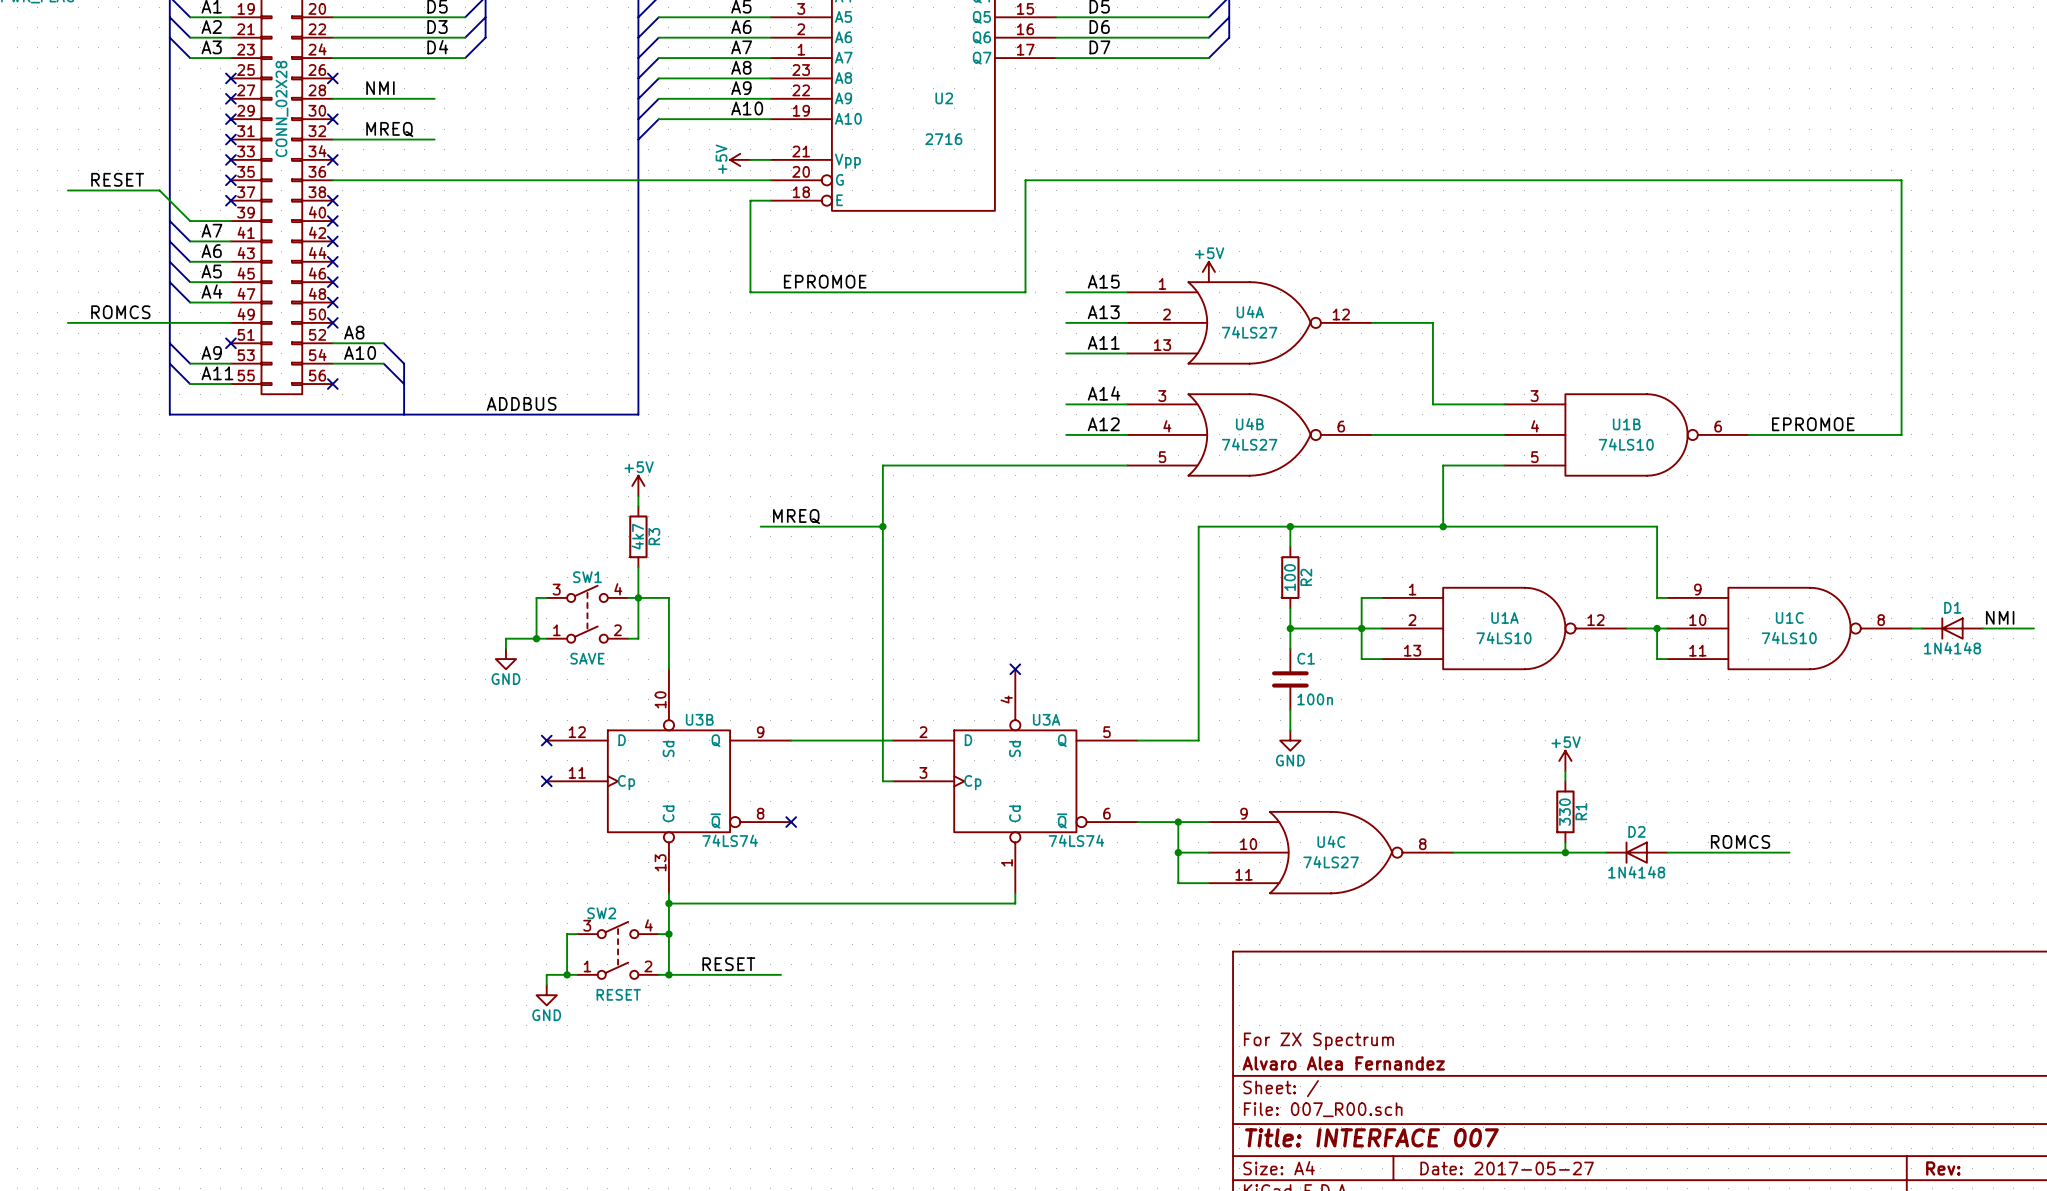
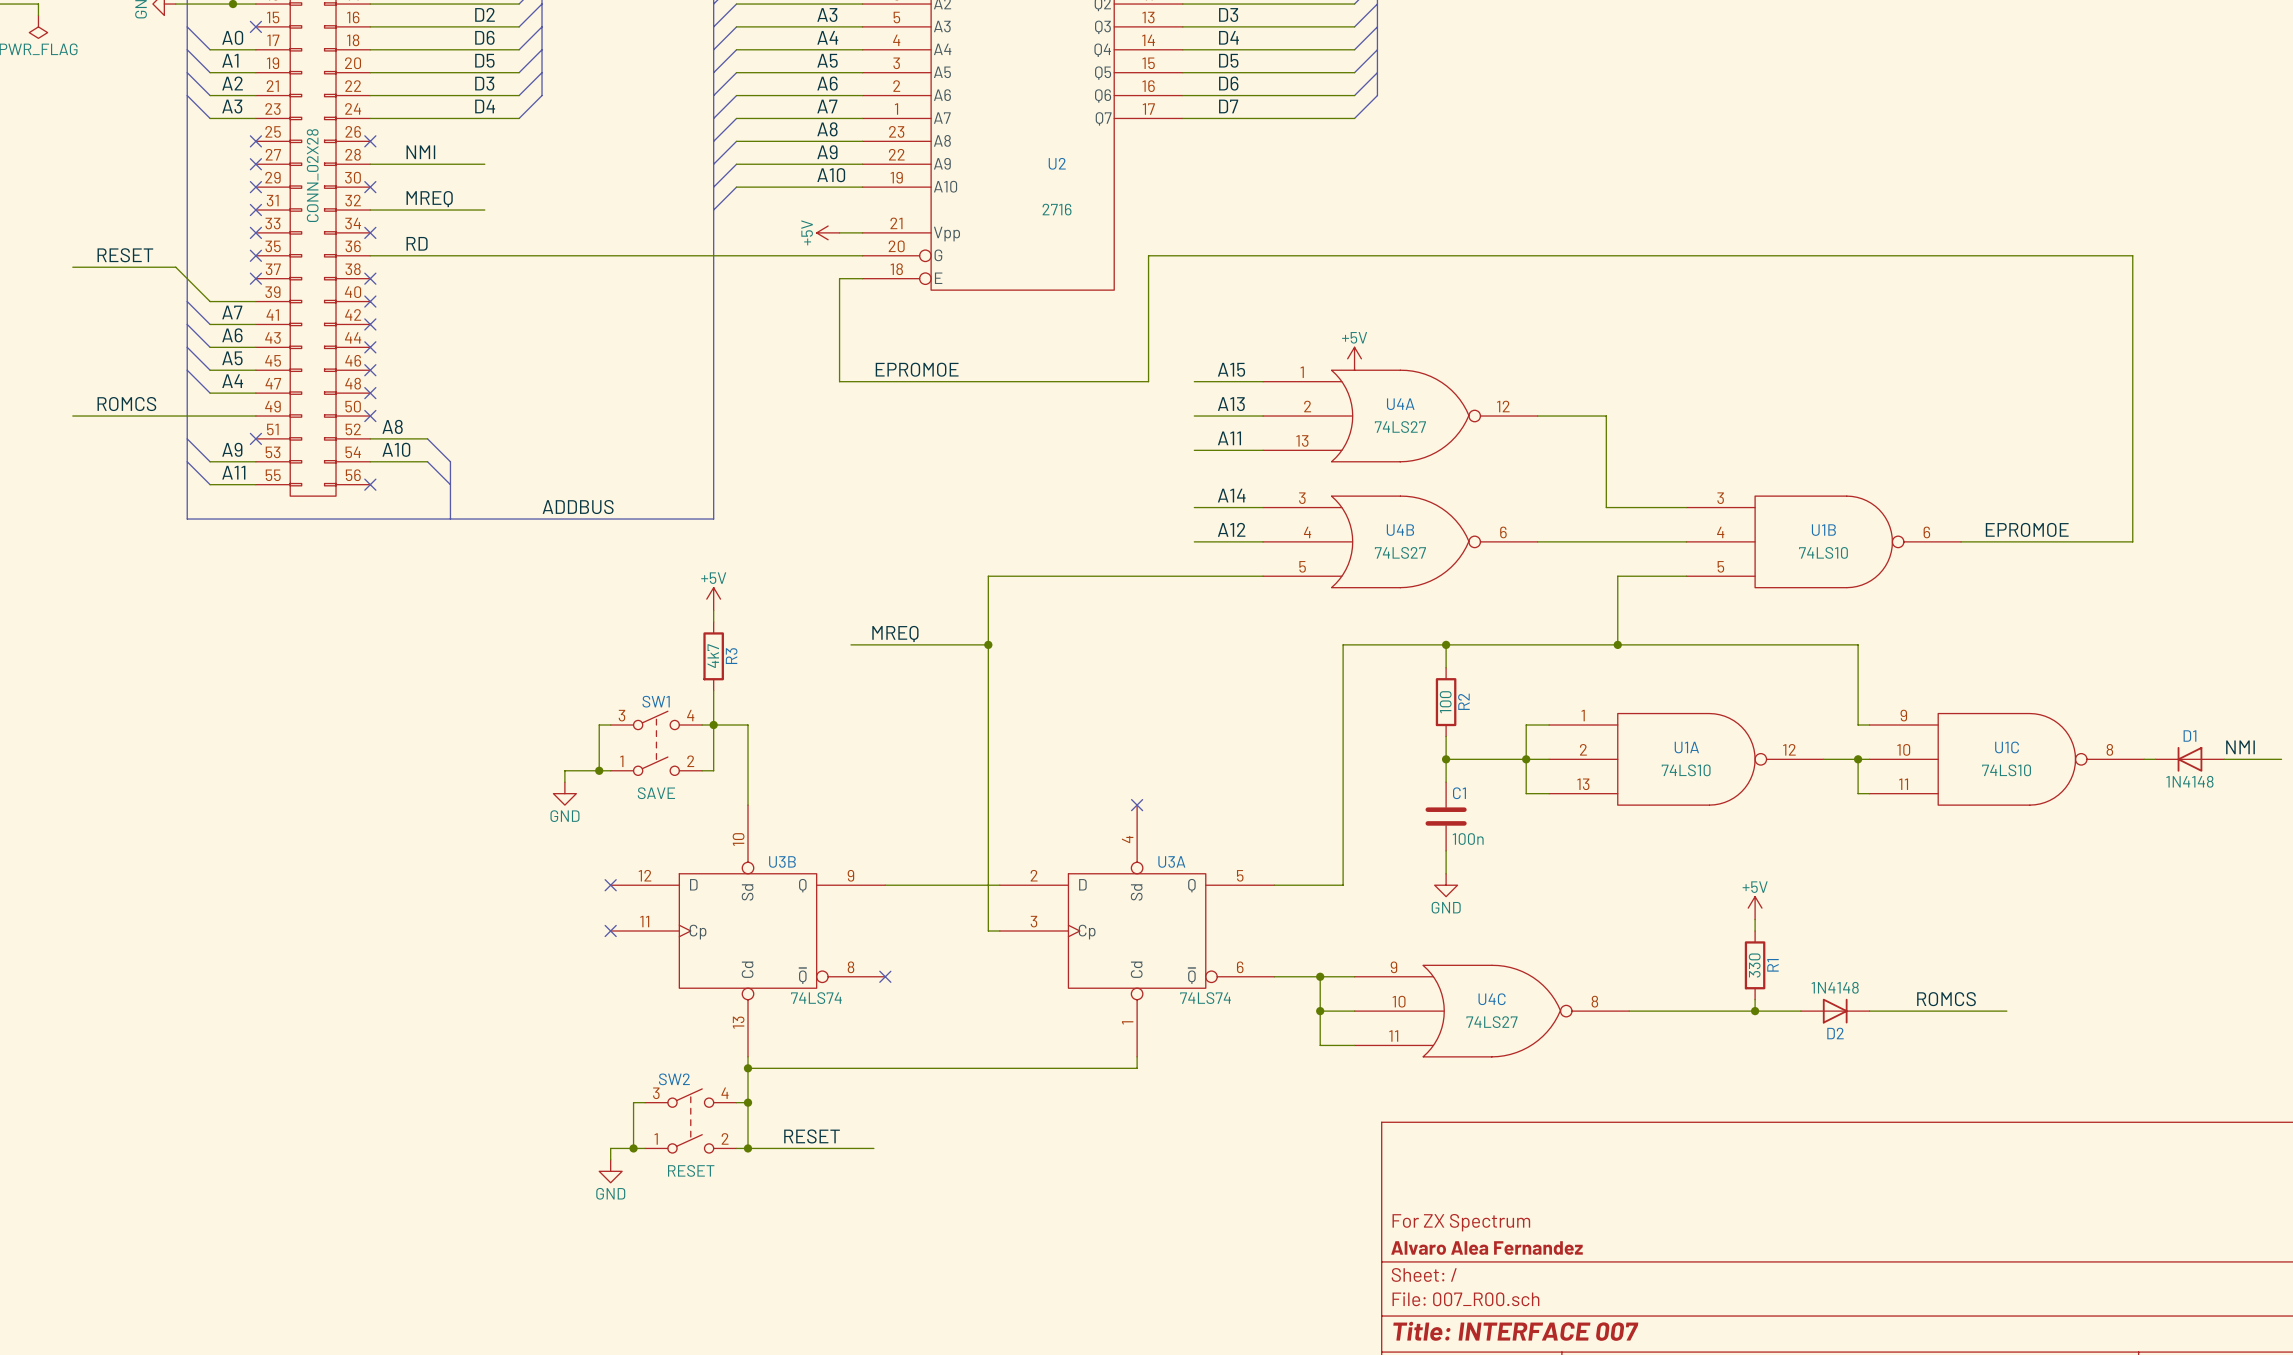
label: none -> RD (417, 243)
D2 rotation: 0° (1636, 852) -> 180° (1835, 1011)

